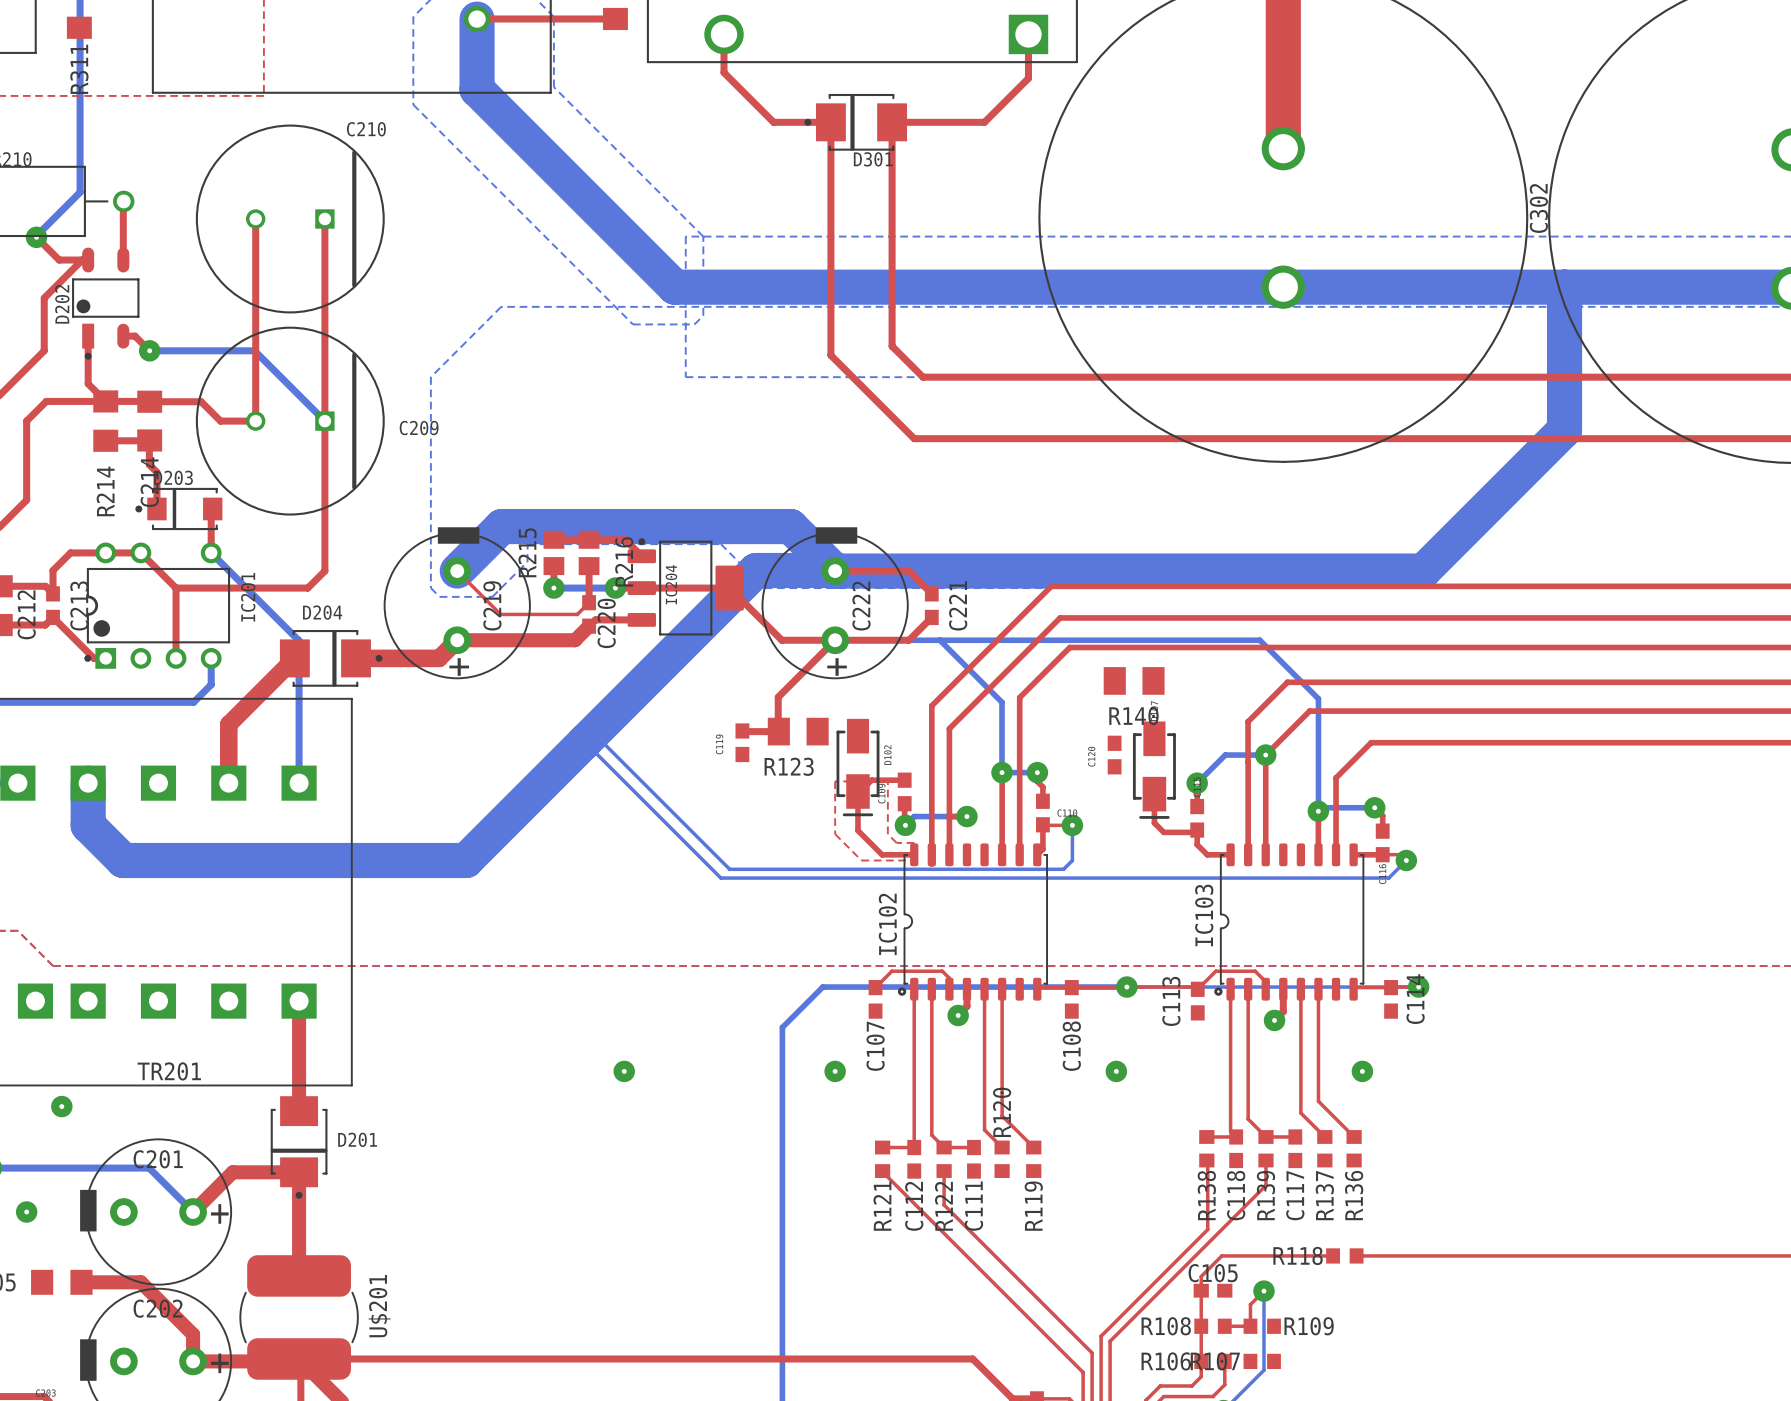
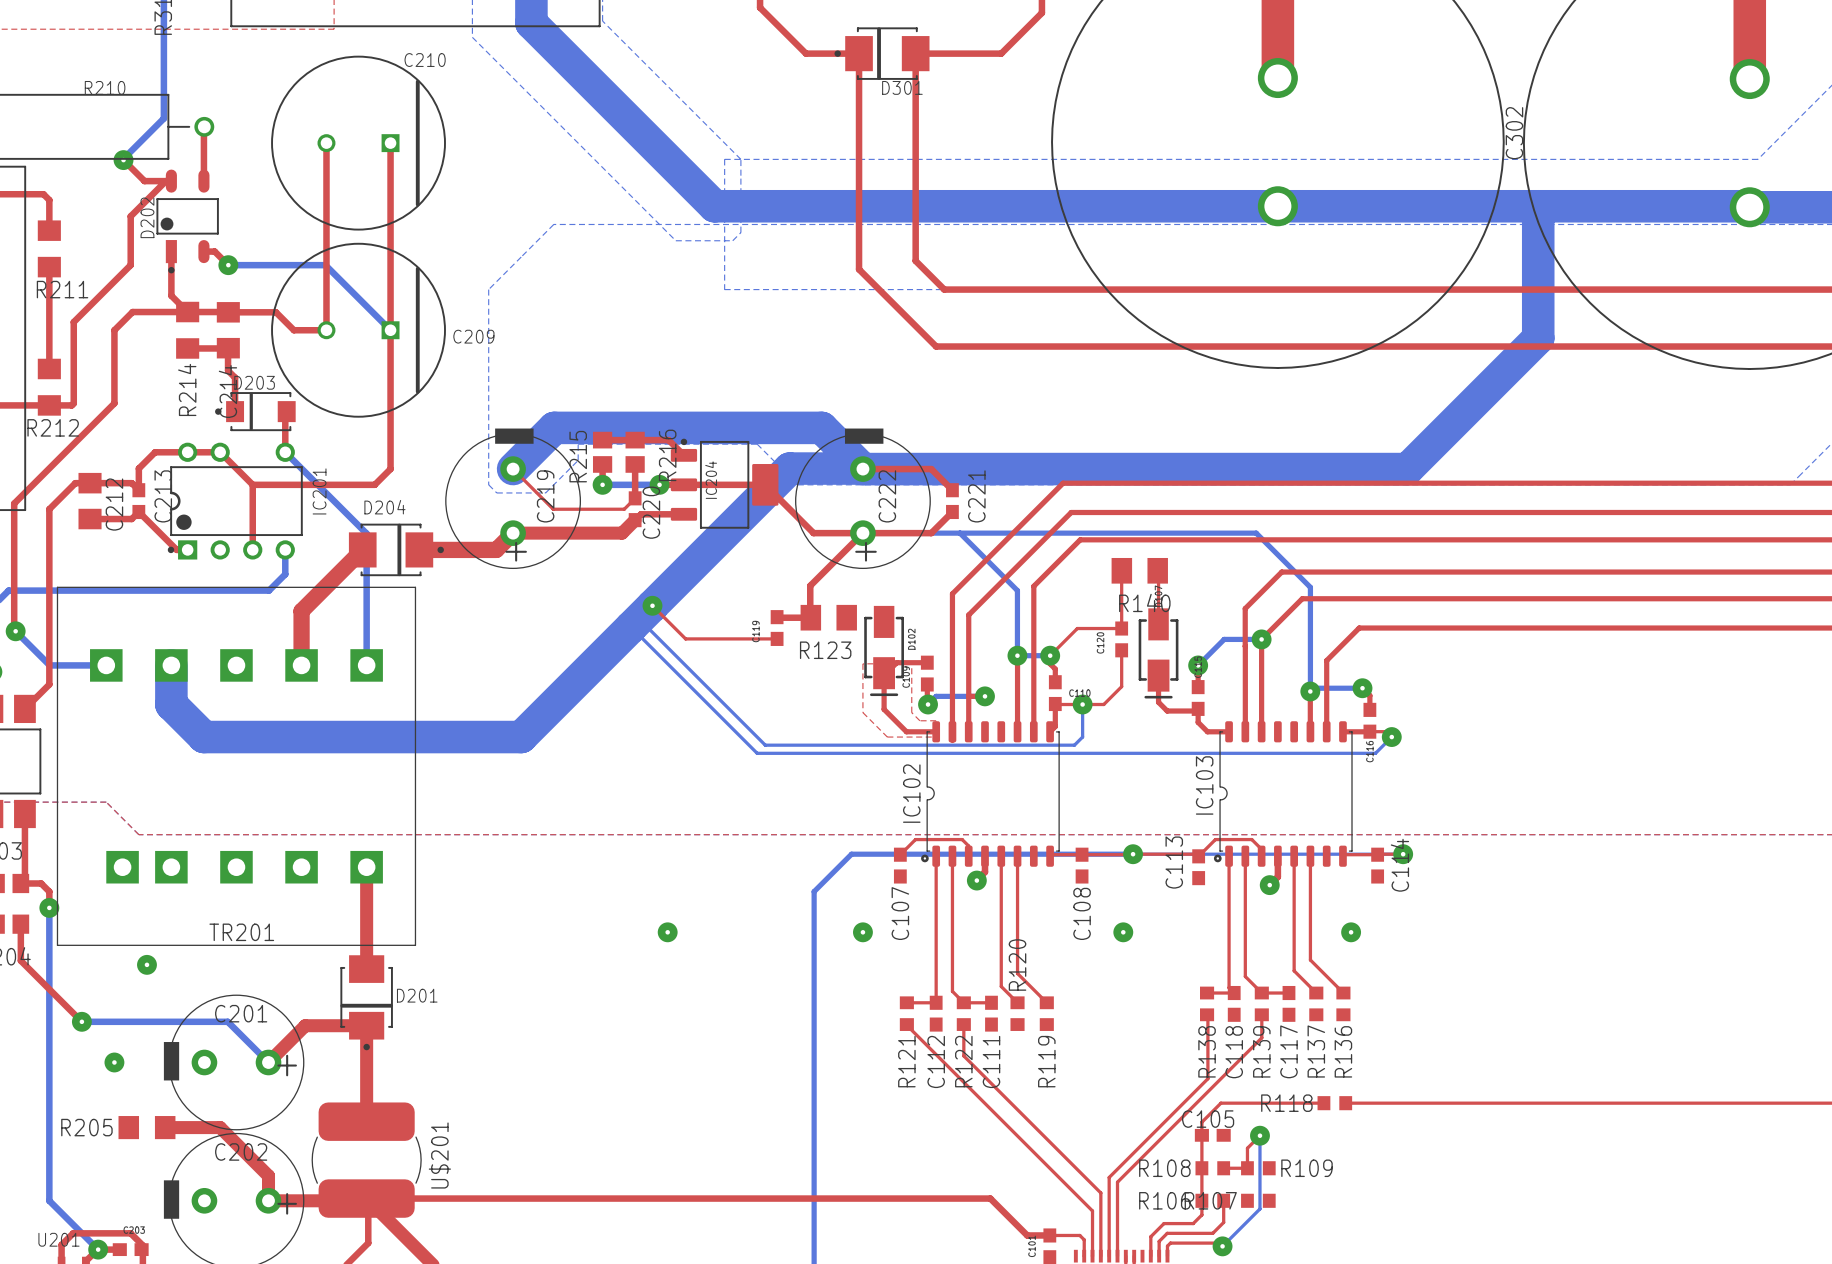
top track: none -> (1157, 570) (1158, 624)
top track: none -> (1121, 570) (1121, 628) (1077, 628) (1050, 655)
top track: none -> (652, 605) (685, 638) (777, 638)
via: none -> (652, 605)
top track: none -> (1121, 650) (1121, 686) (1103, 704) (1082, 704)

